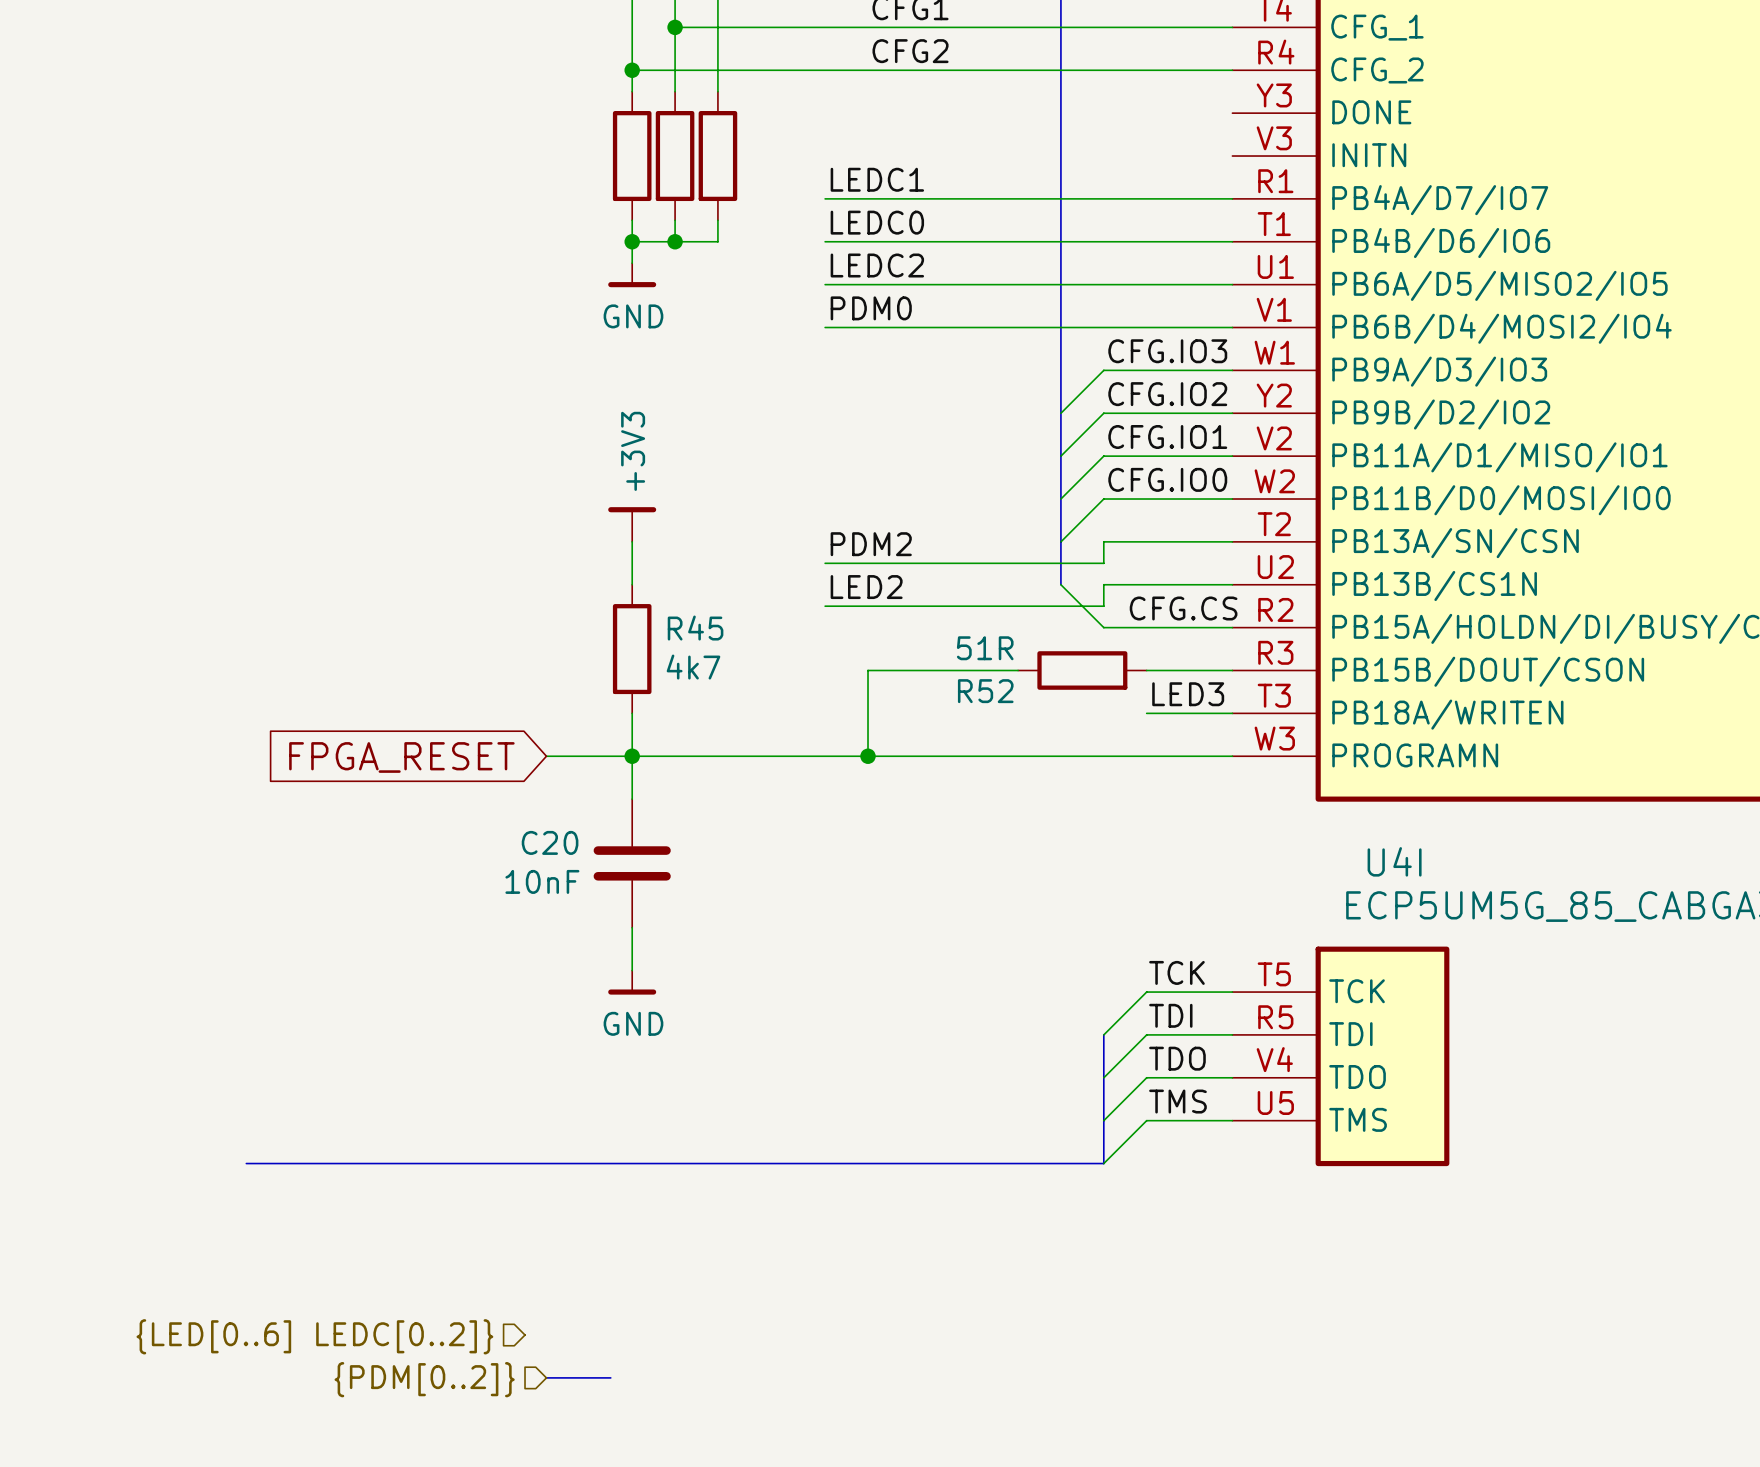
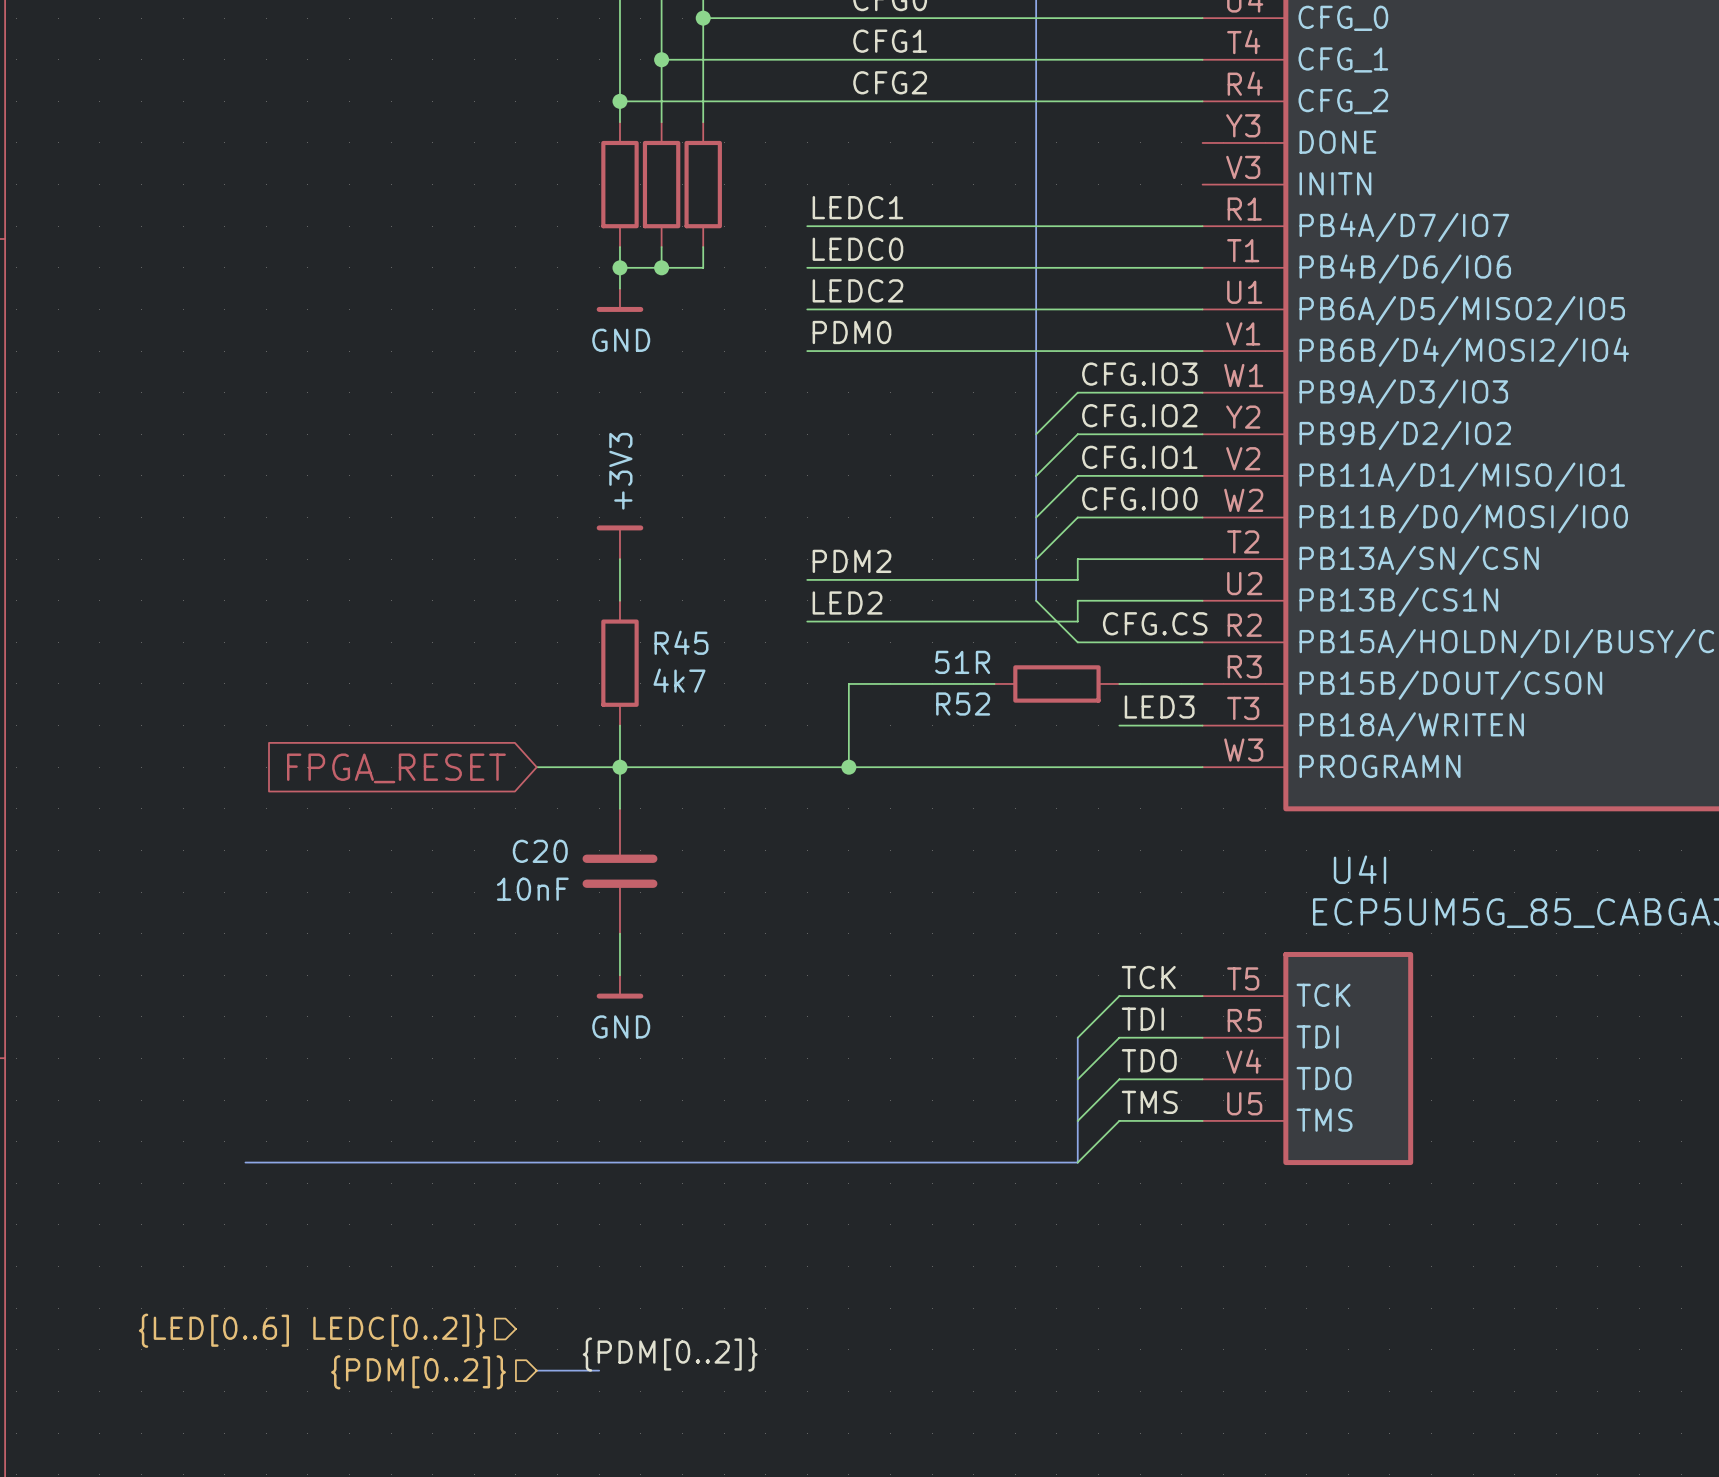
label: none -> {PDM[0..2]} (670, 1354)

